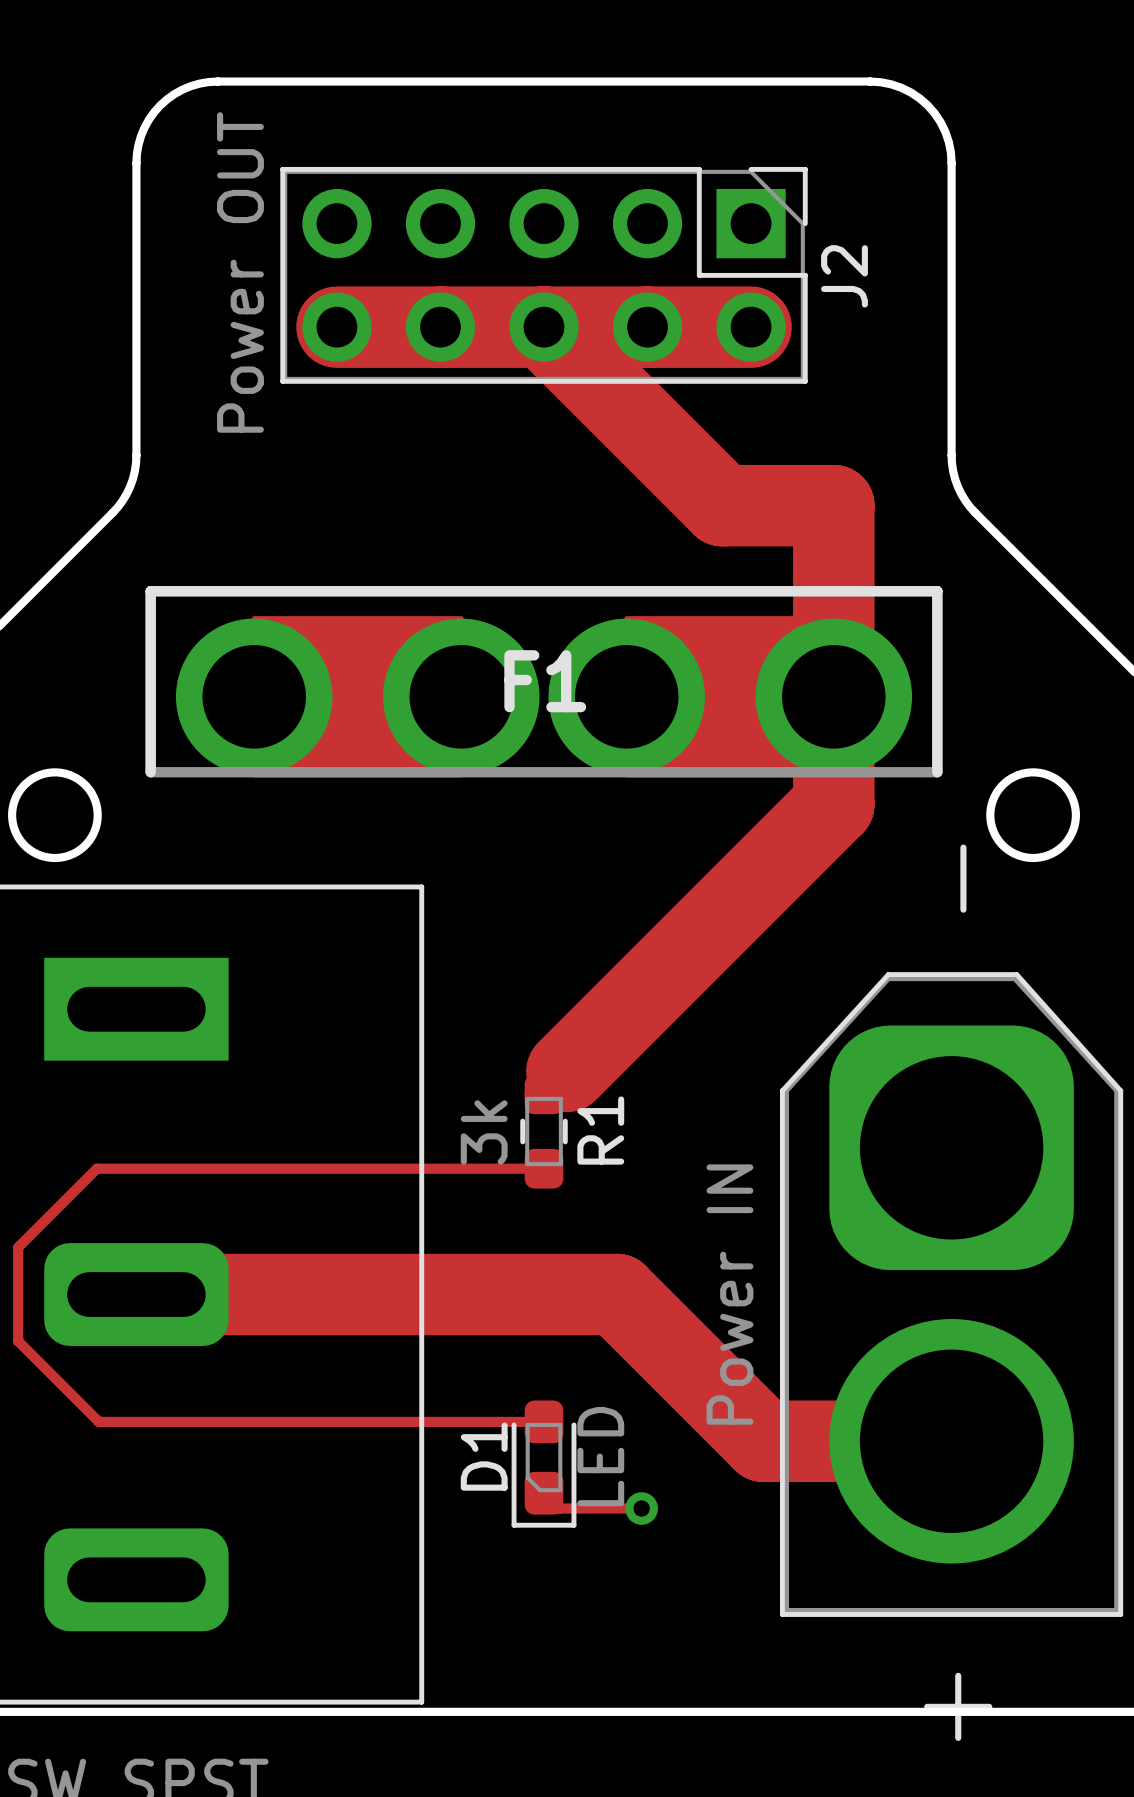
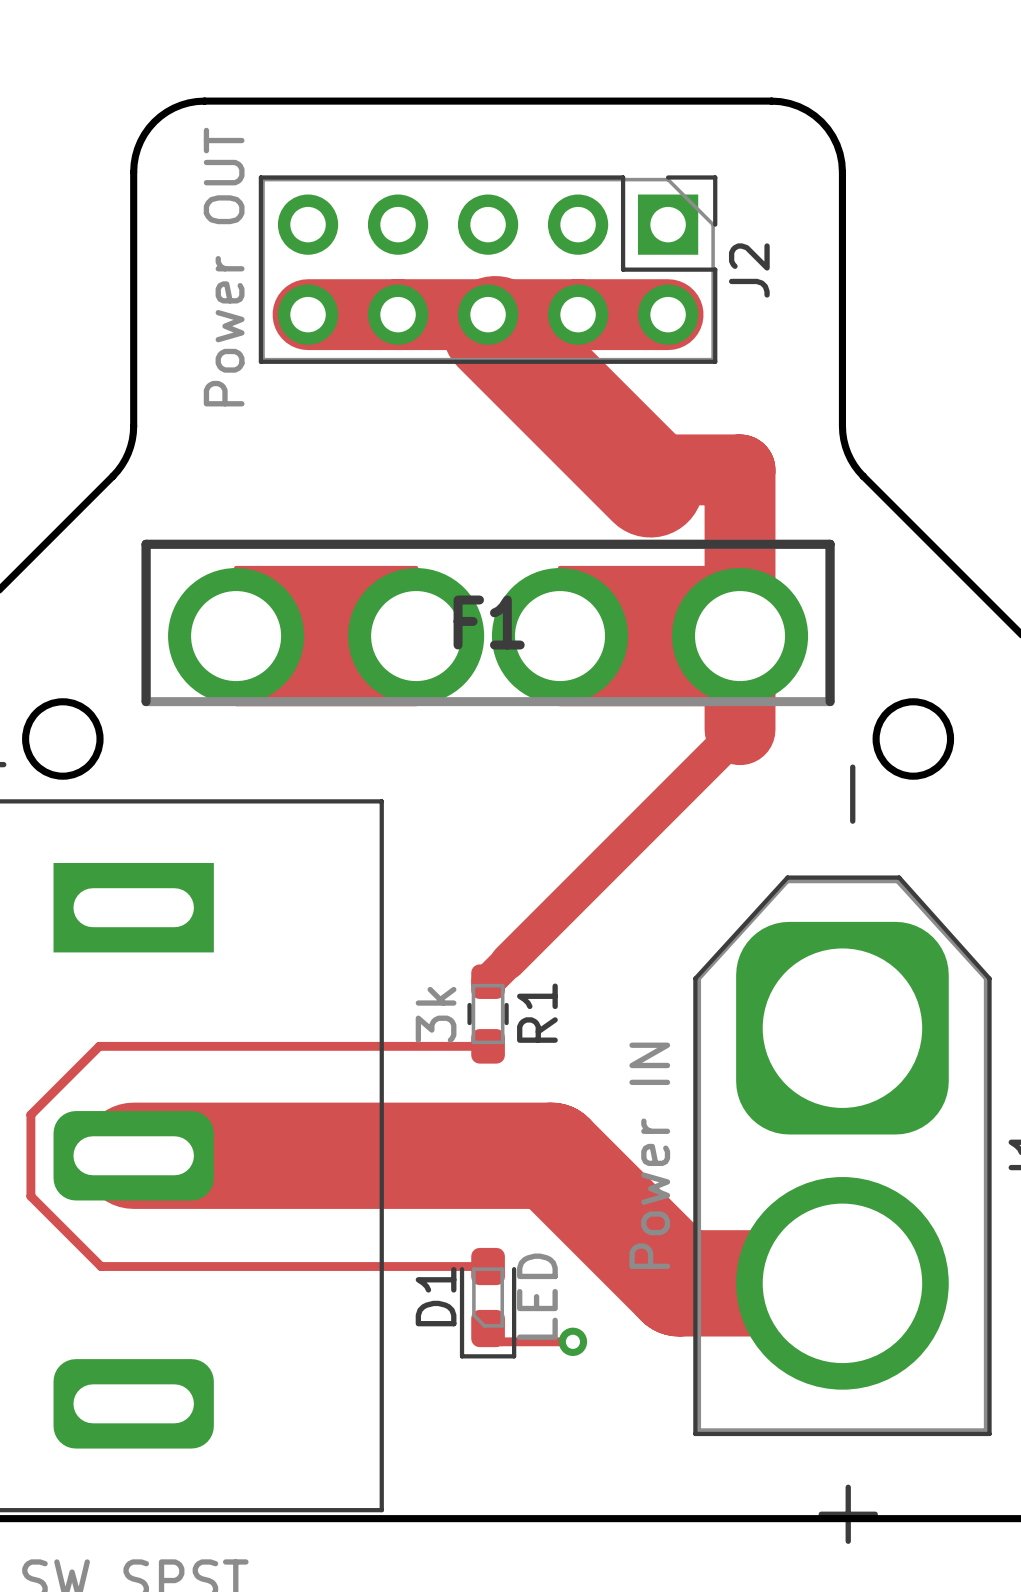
track: (544, 327) (722, 505) -> (495, 329) (650, 484)
track width: thick (833, 804) (566, 1071) -> thin (740, 729) (507, 961)
track width: thin (136, 1294) (616, 1294) (763, 1441) (951, 1441) -> thick (133, 1155) (551, 1155) (679, 1283) (842, 1283)

